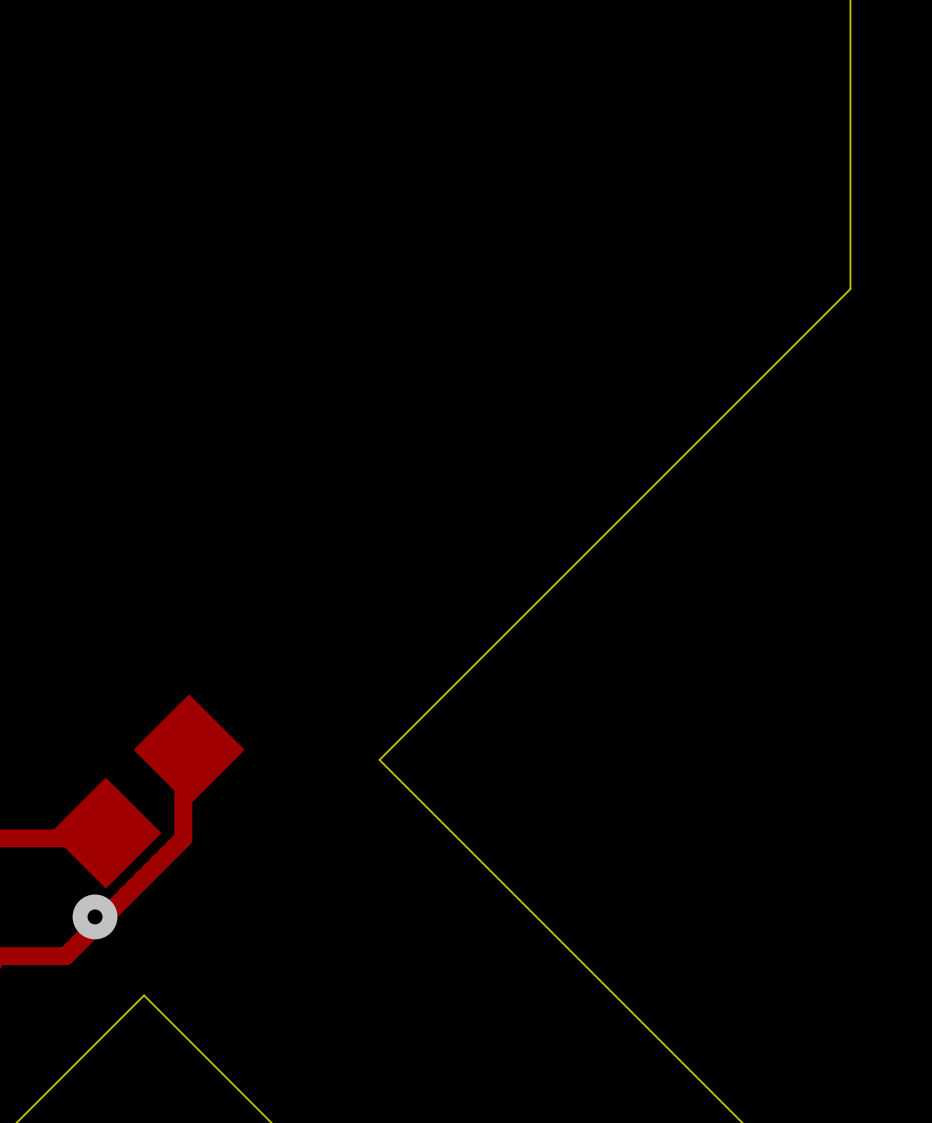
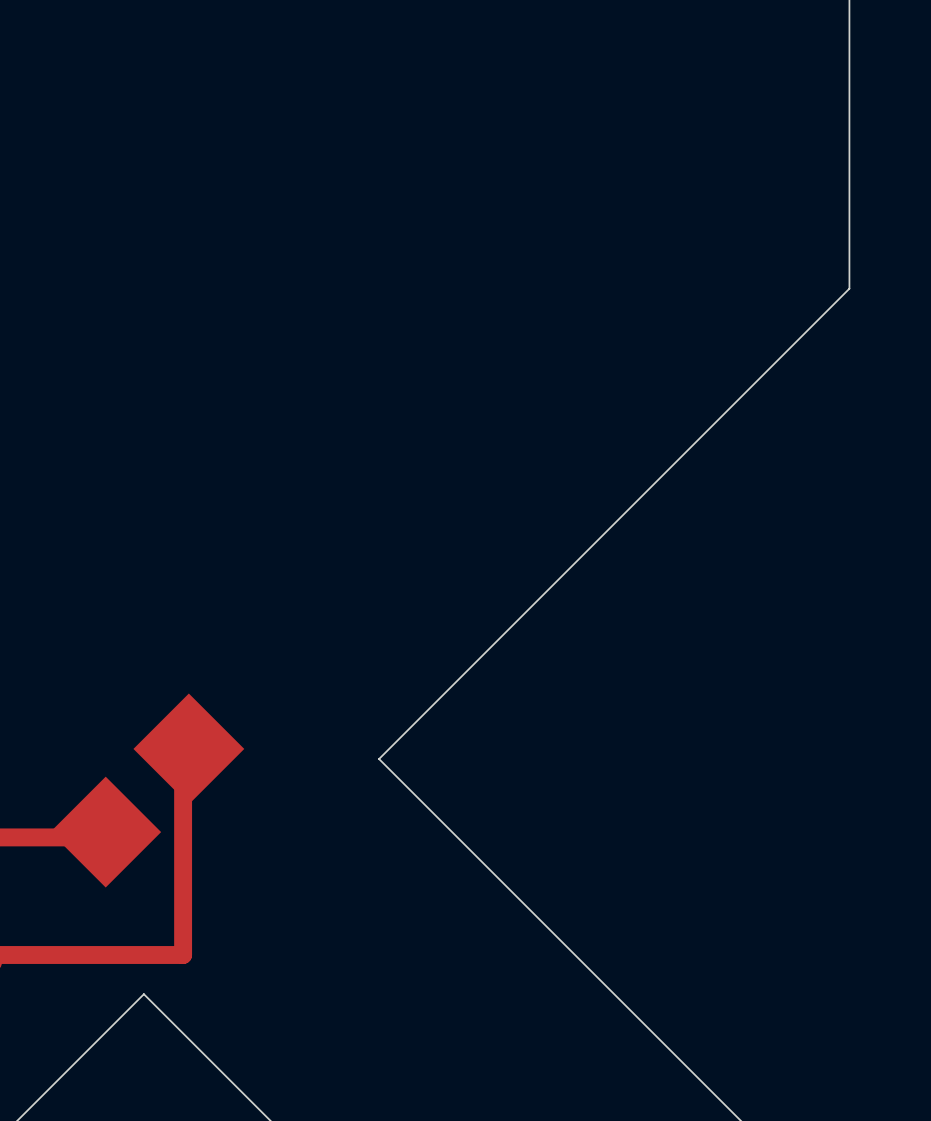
top track: (183, 838) (65, 956) -> (183, 837) (183, 955) (65, 955)
via: (95, 916) -> none

